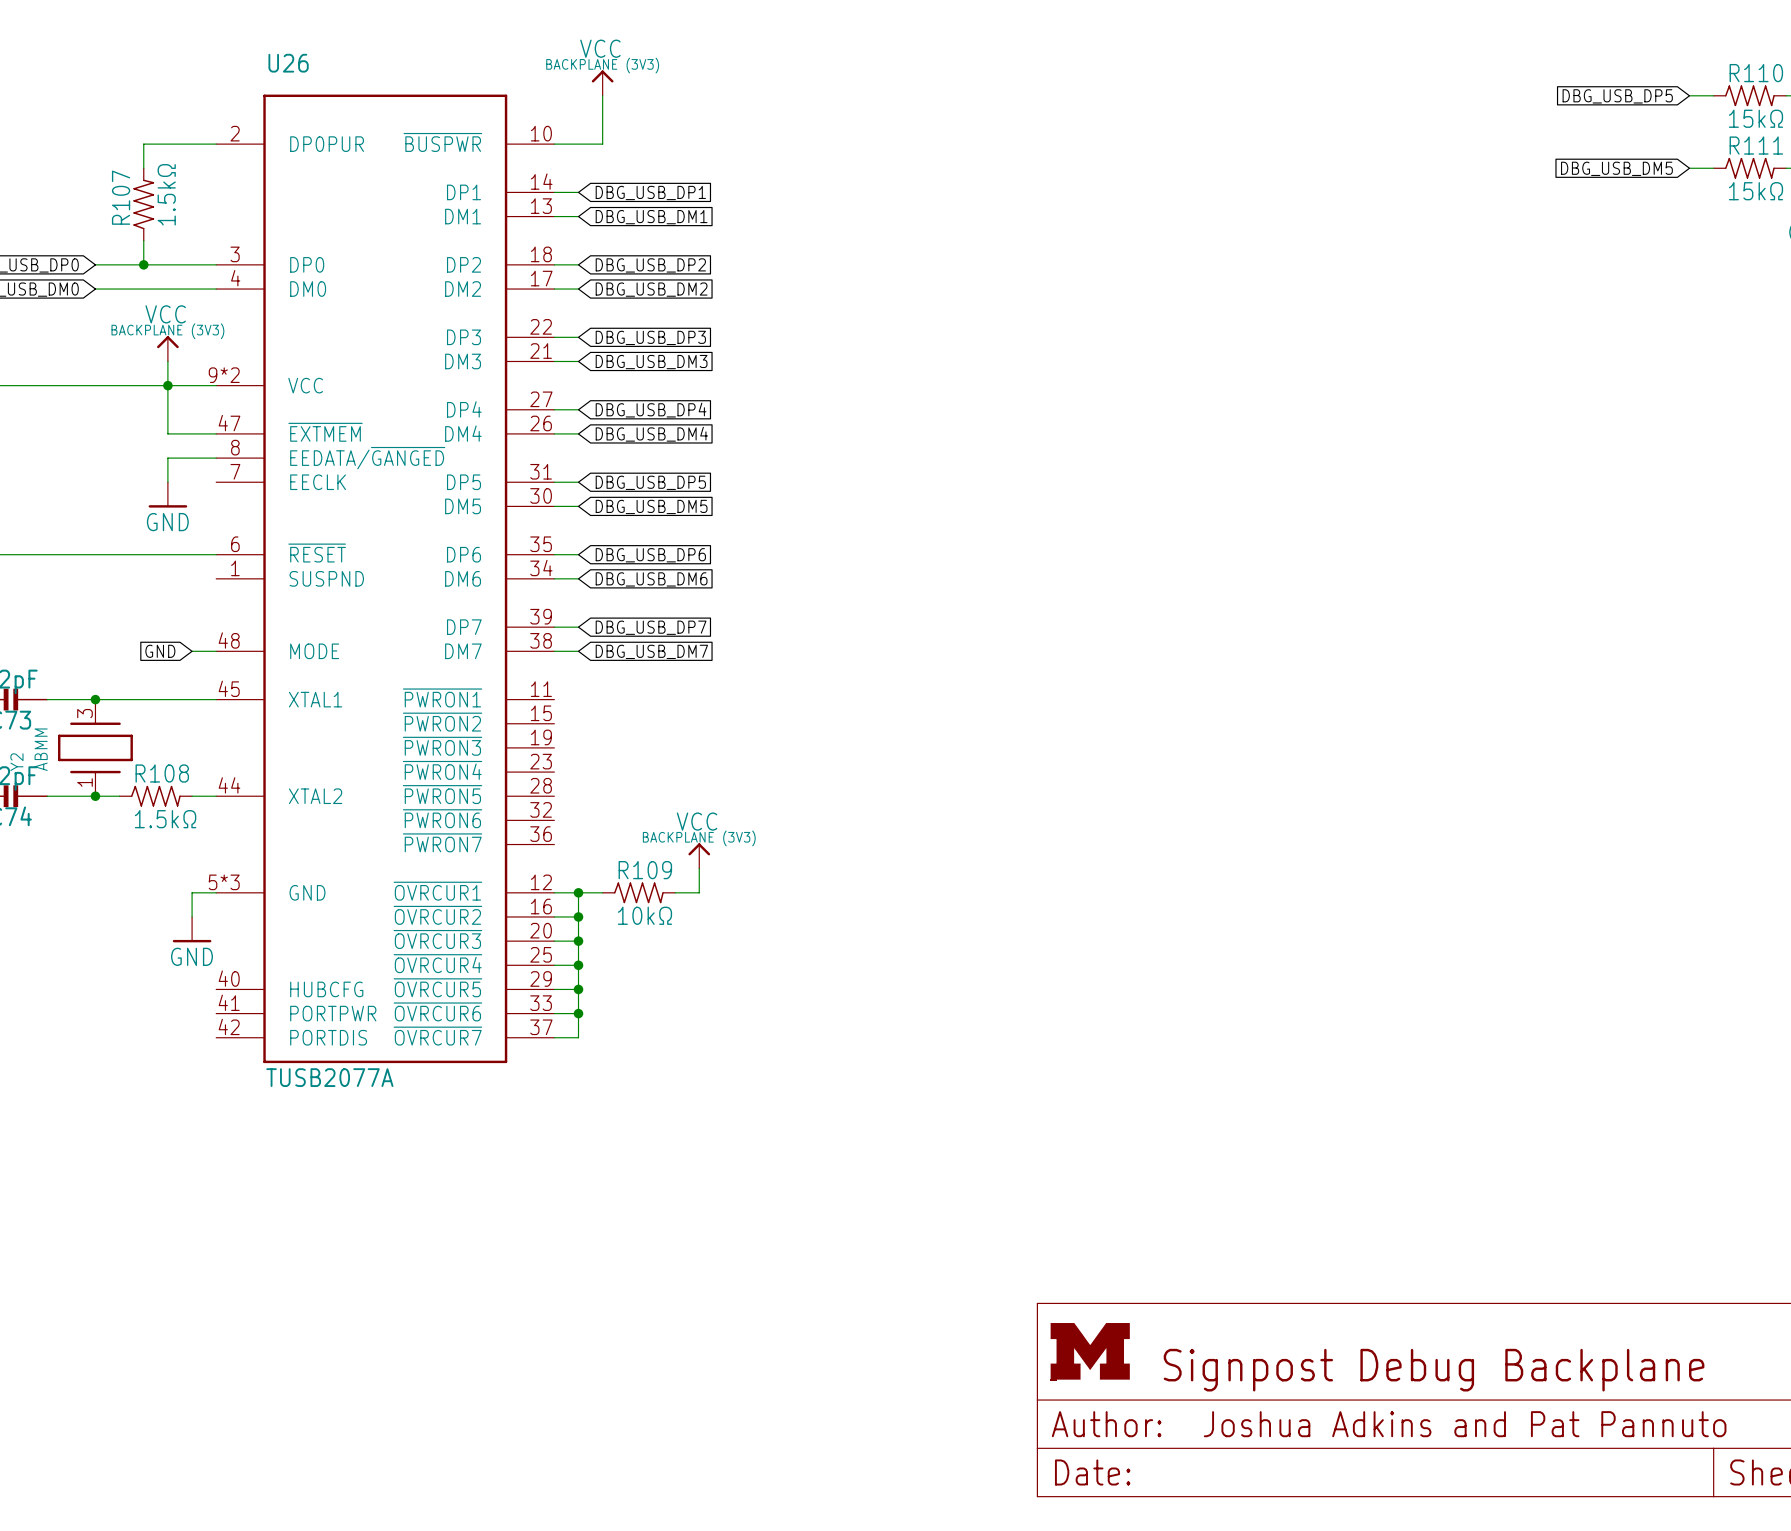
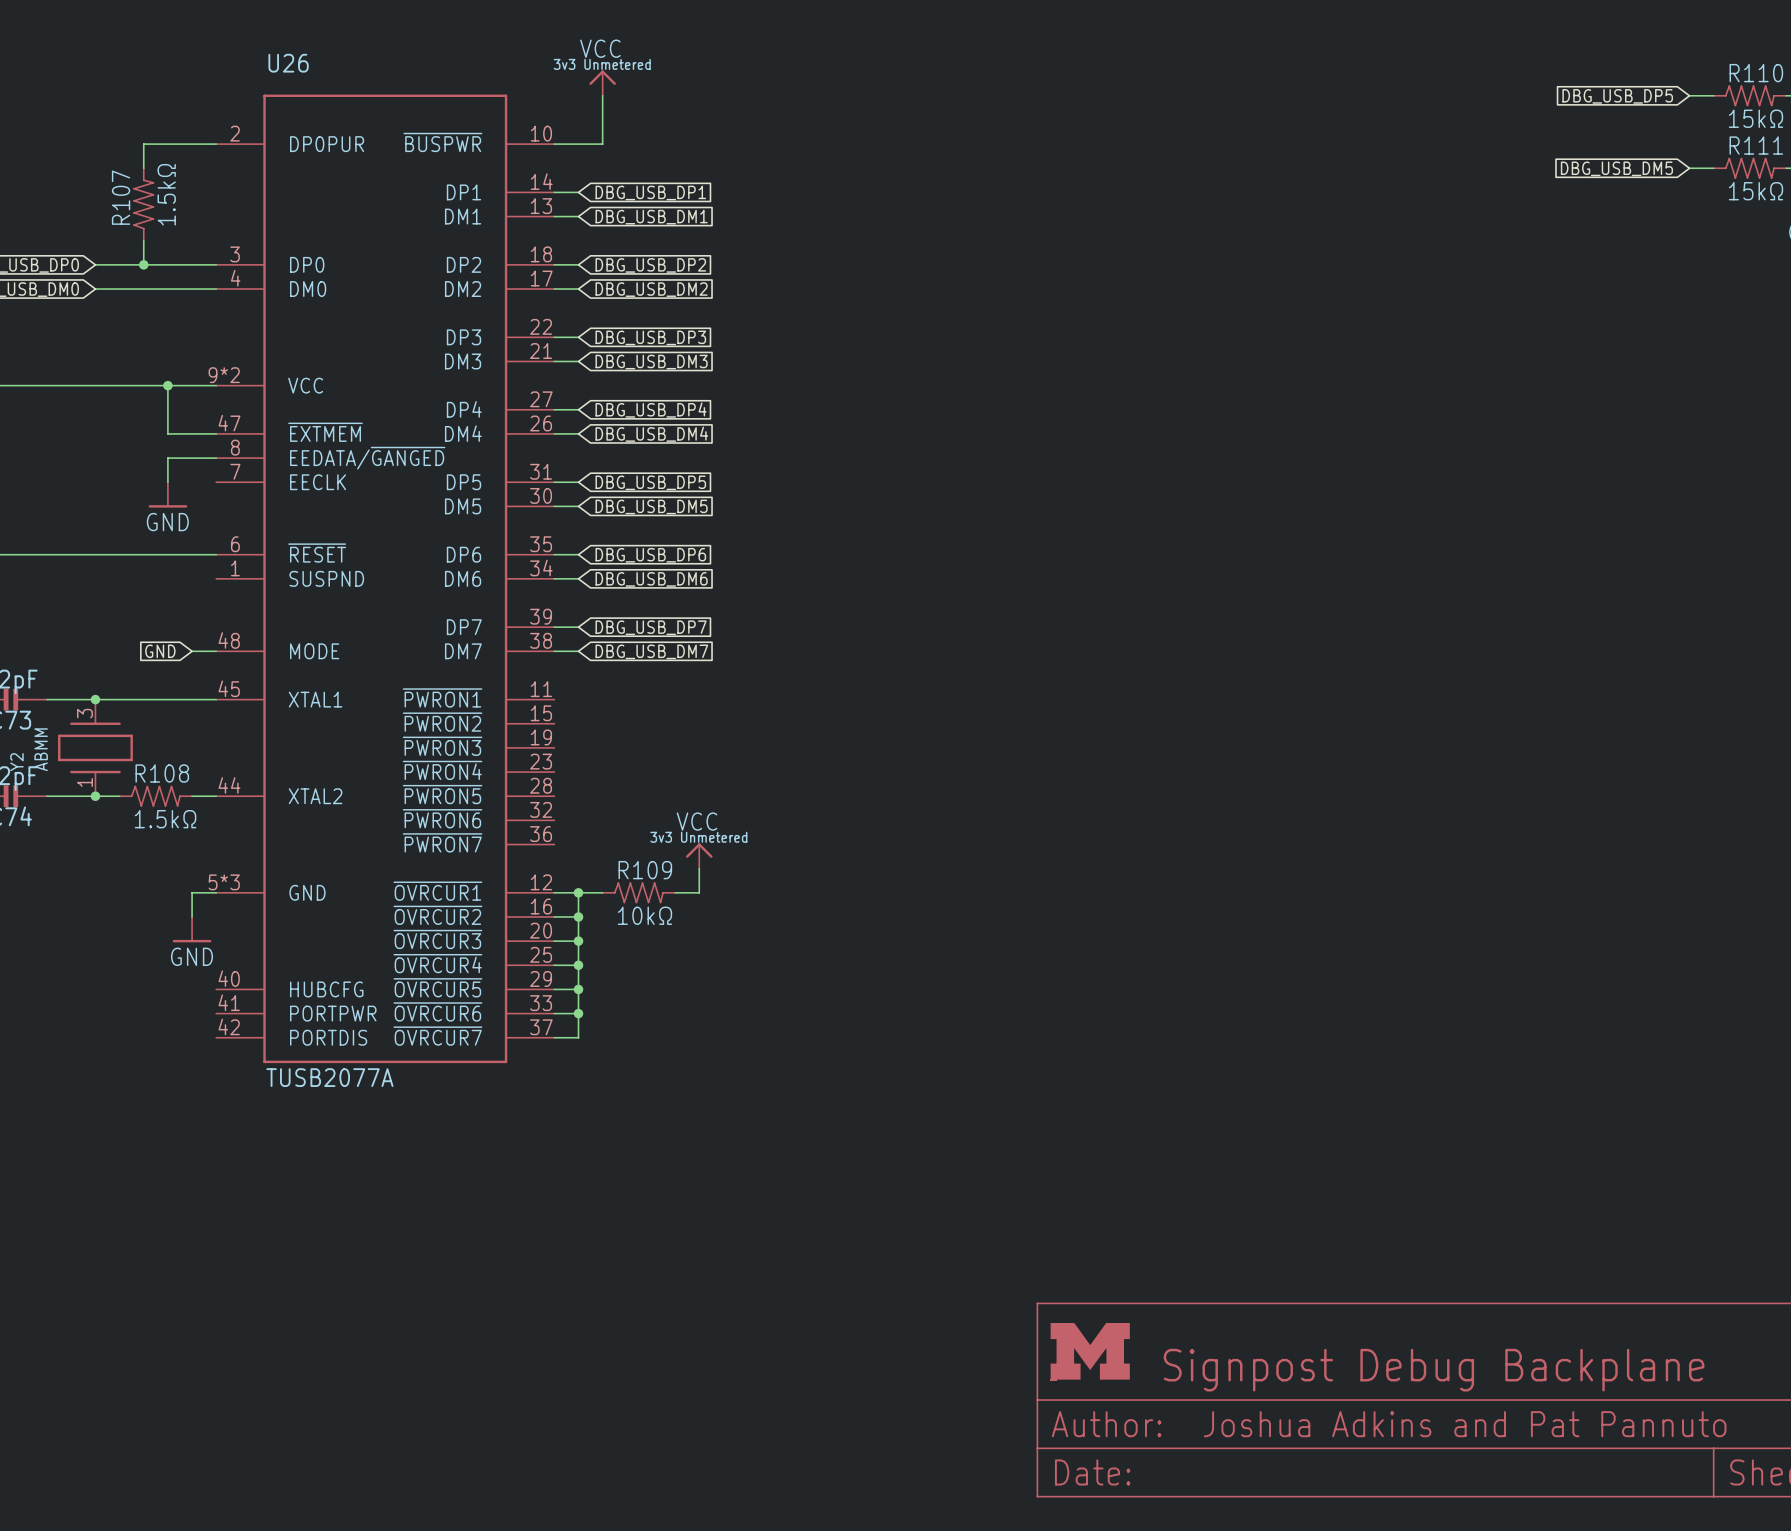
power symbol shape: [591, 70, 614, 96] -> [589, 70, 616, 96]
power symbol: (167, 348) -> none
wire: (167, 361) (167, 385) -> none
power symbol shape: [688, 843, 711, 869] -> [685, 843, 713, 869]

